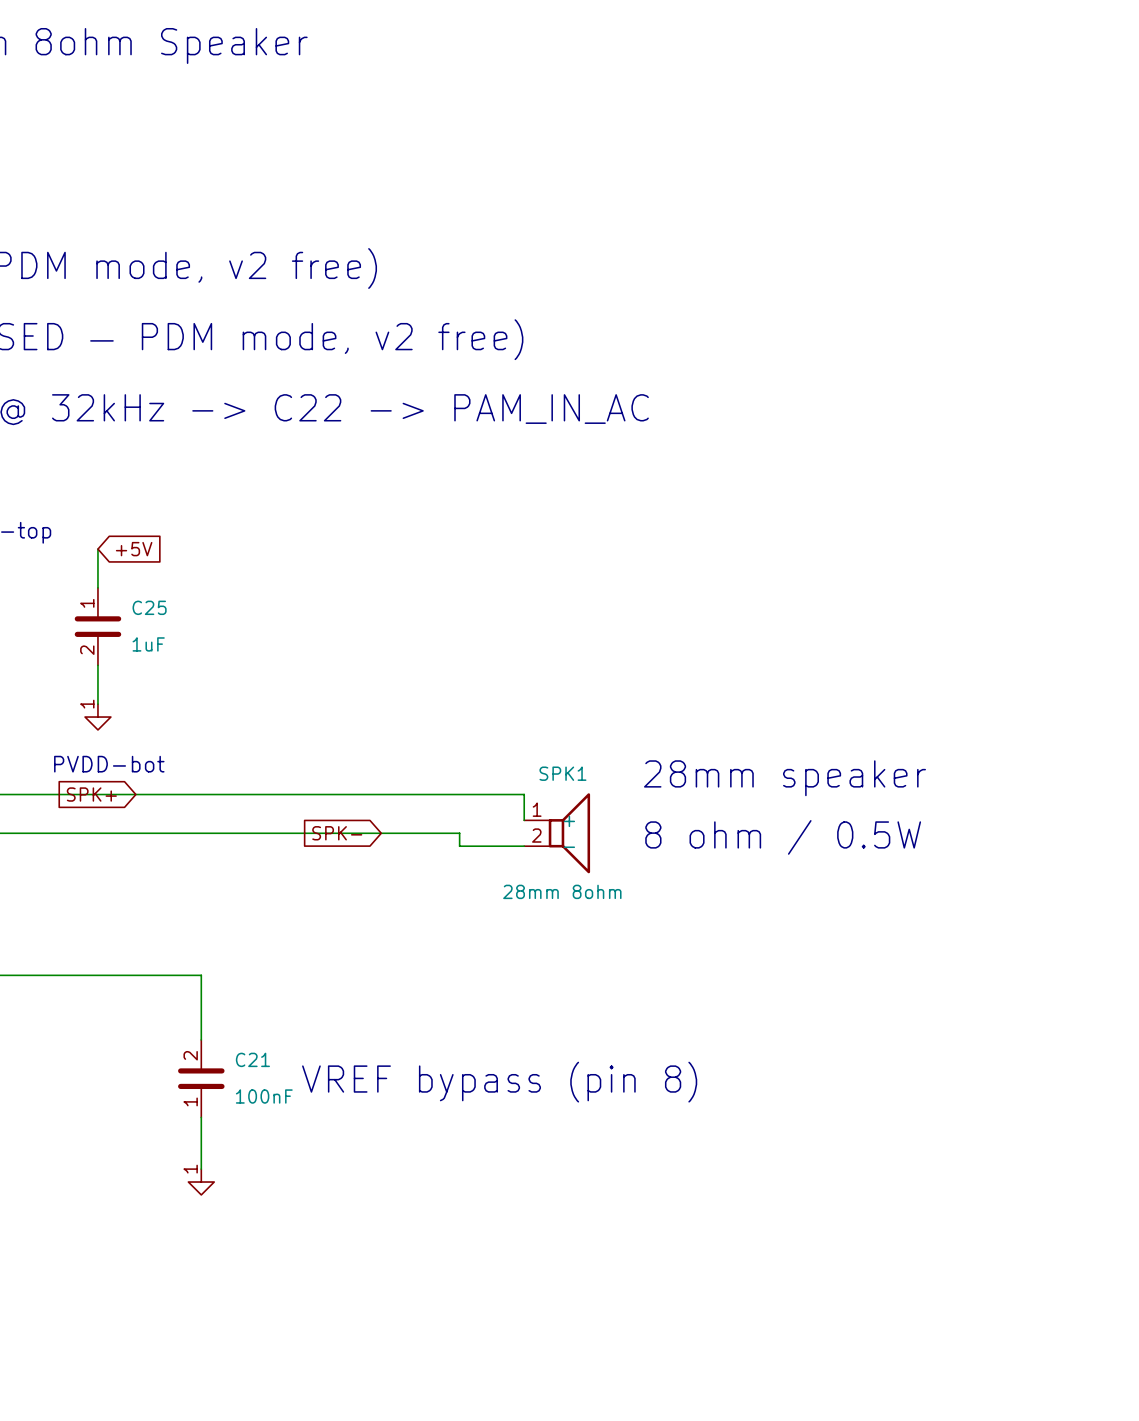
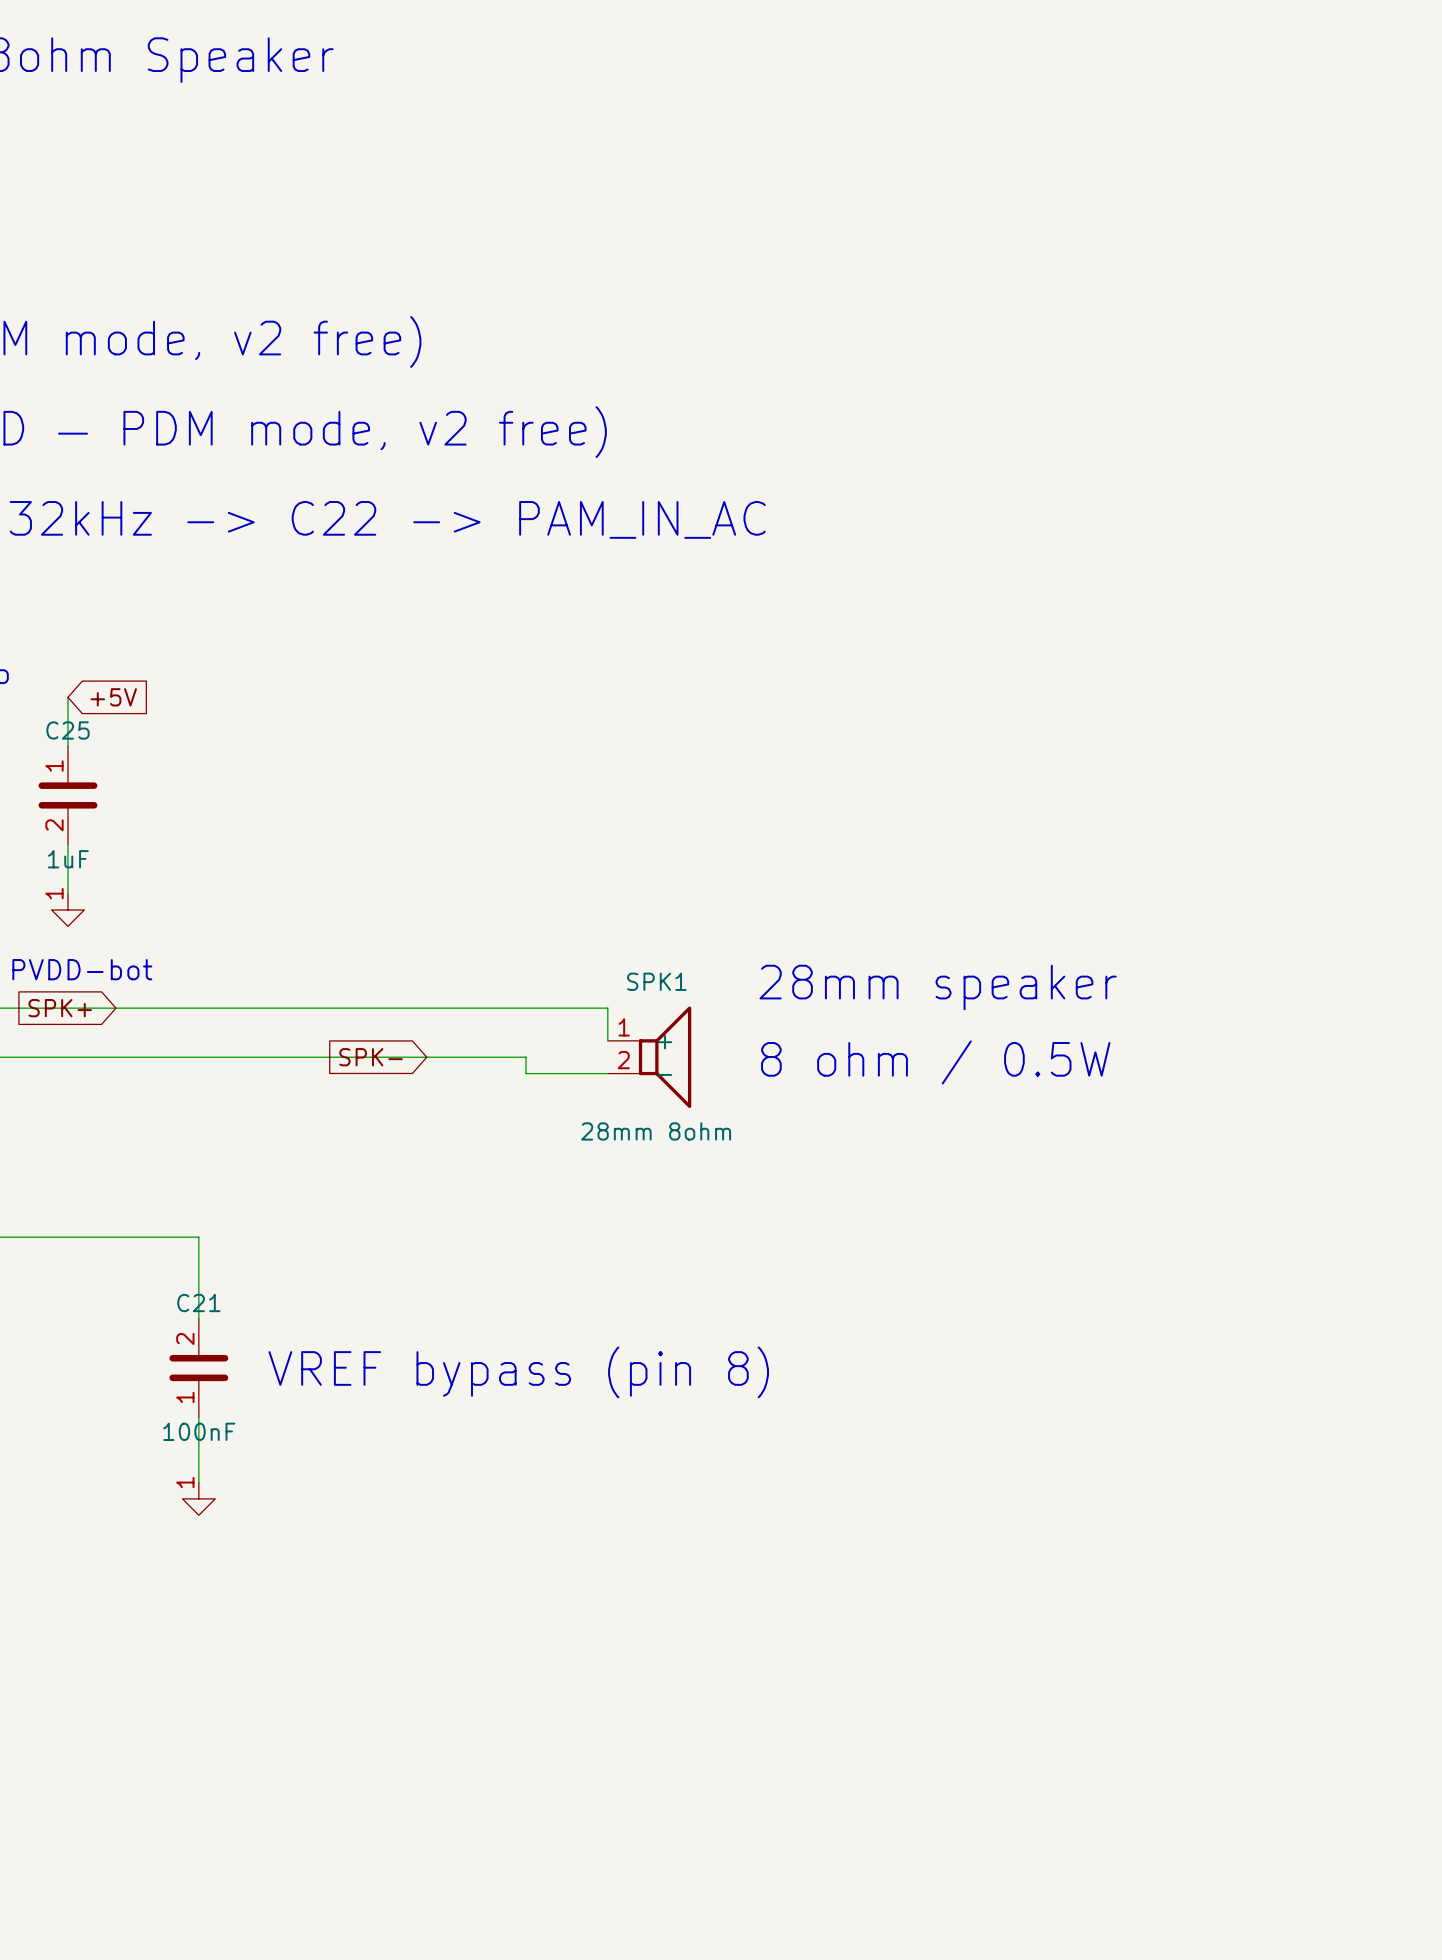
C25 name position: C25 (149, 607) -> C25 (67, 730)
C25 value position: 1uF (148, 644) -> 1uF (68, 859)
C21 name position: C21 (252, 1059) -> C21 (198, 1303)
text position: VREF bypass (pin 8) (499, 1082) -> VREF bypass (pin 8) (518, 1372)
C21 value position: 100nF (264, 1096) -> 100nF (199, 1431)

